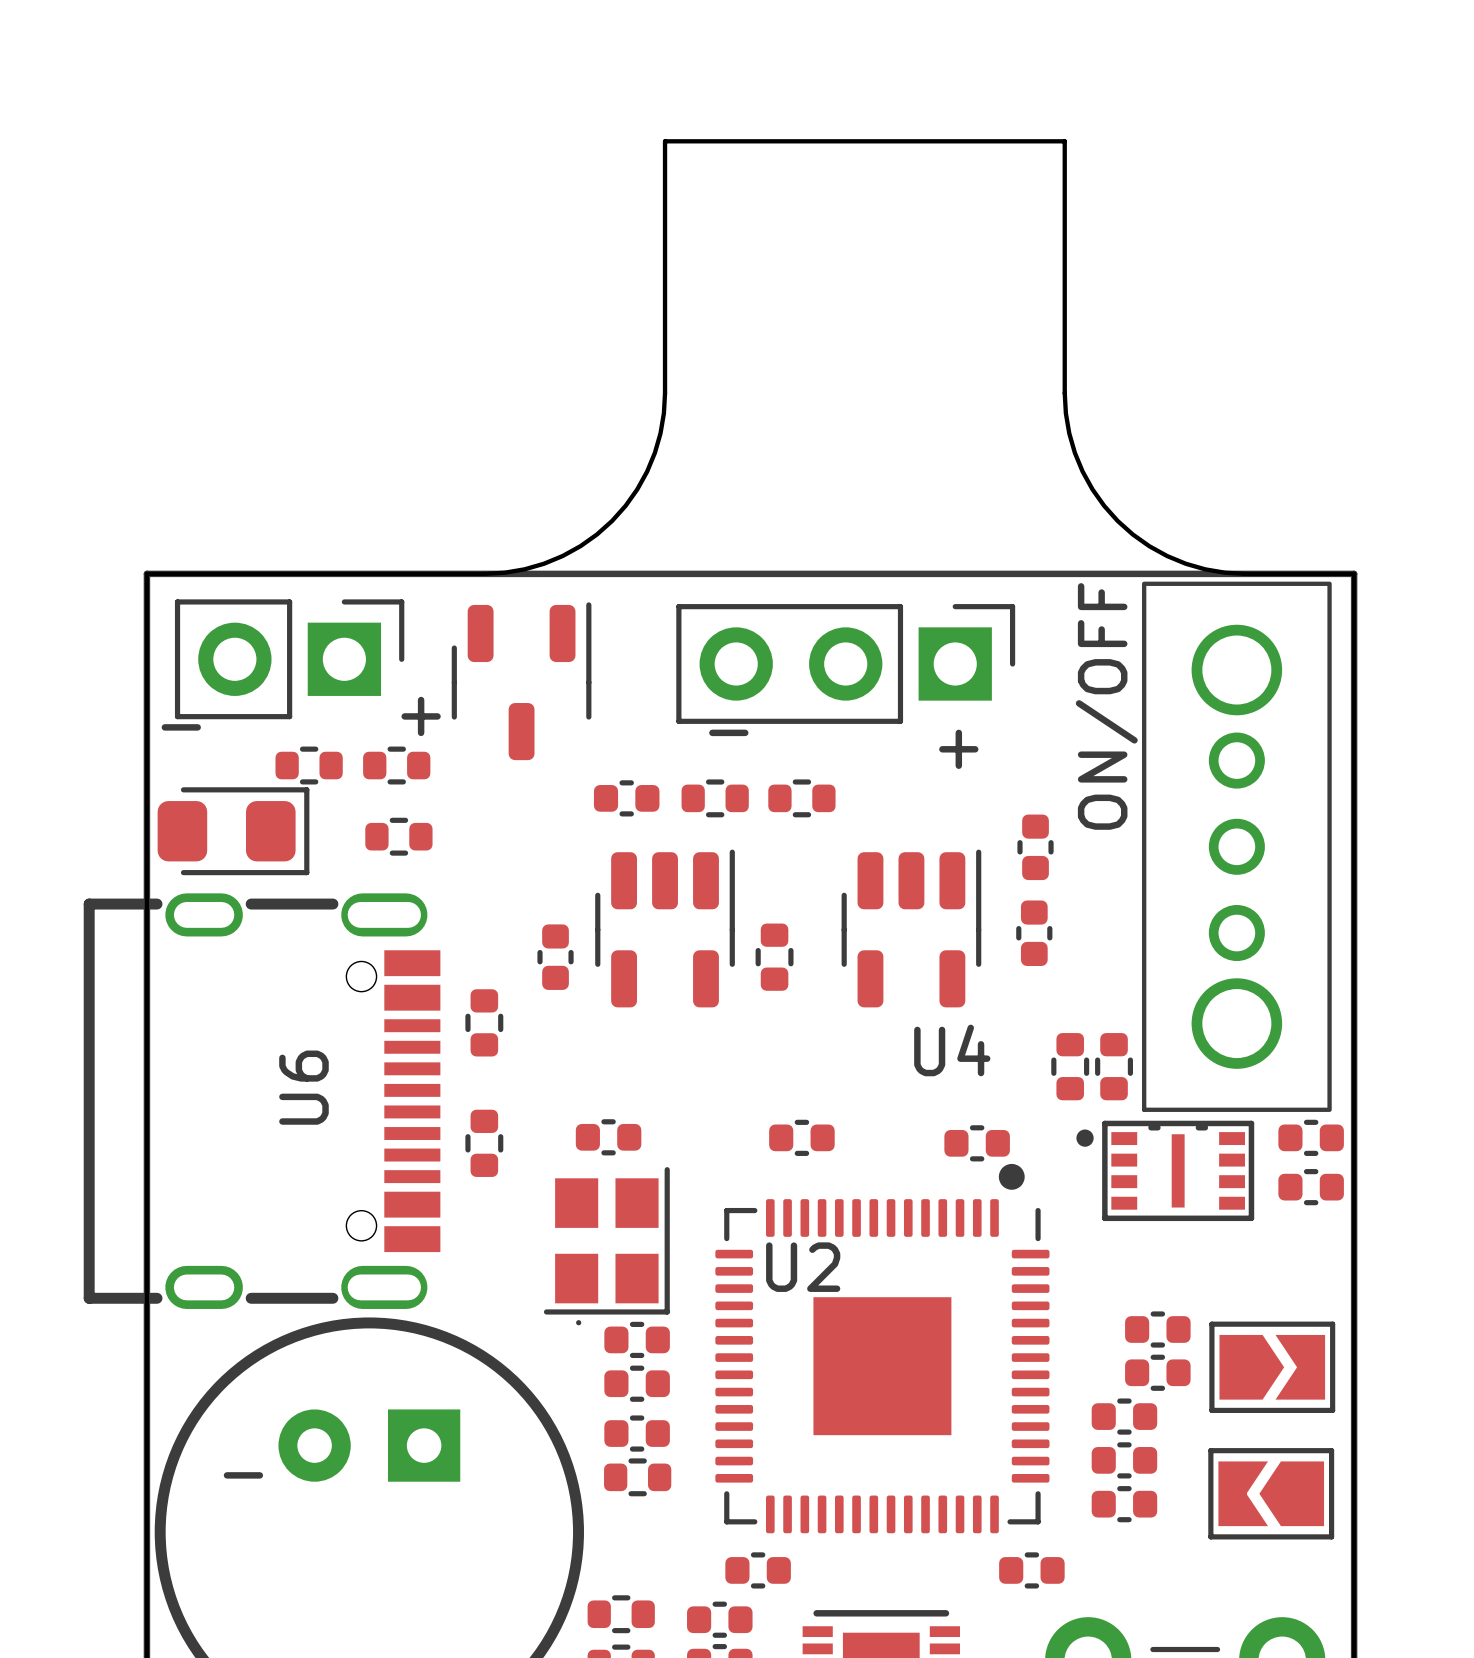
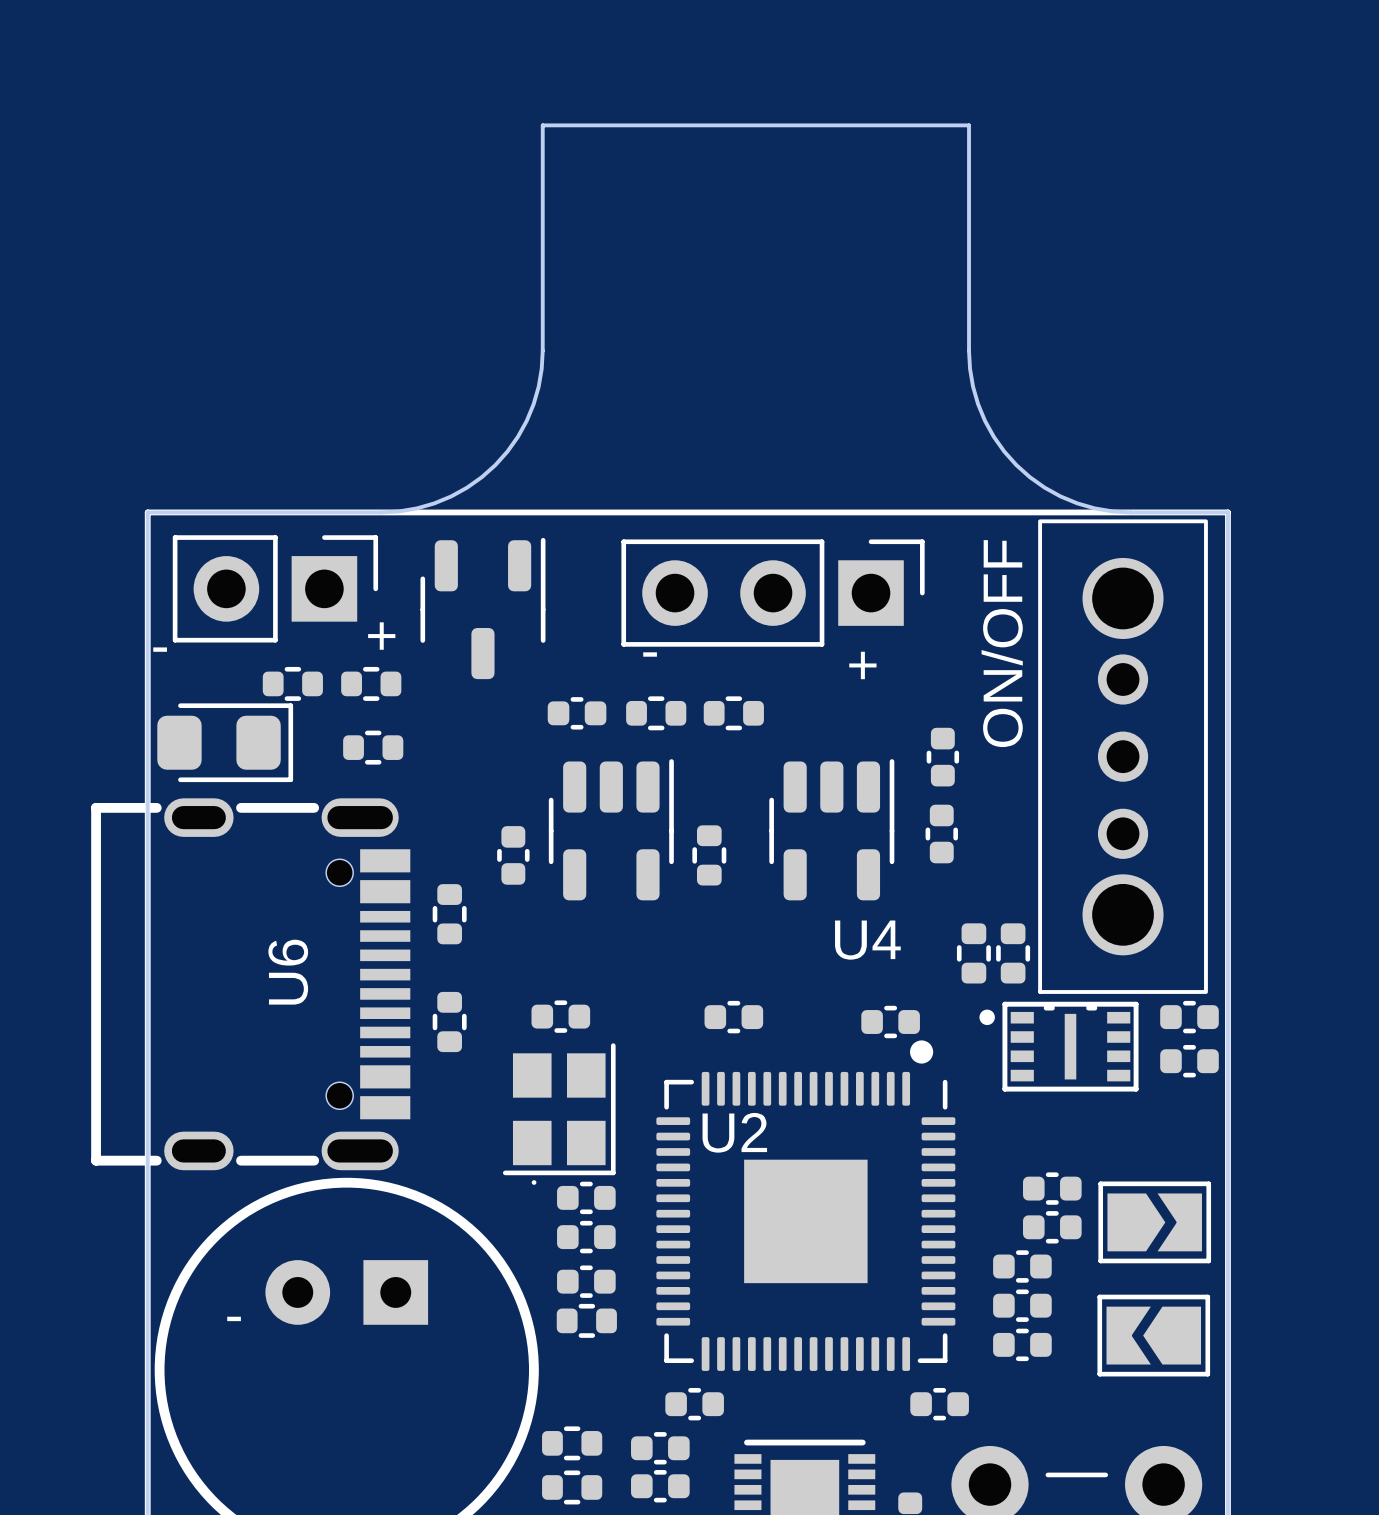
board edge: (665, 141) (663, 413) (654, 452) (637, 489) (612, 520) (597, 534) (562, 555) (544, 563) (504, 572) (407, 573) -> (611, 125) (542, 125) (541, 368) (533, 404) (517, 436) (495, 465) (467, 487) (434, 503) (417, 508) (381, 512)

